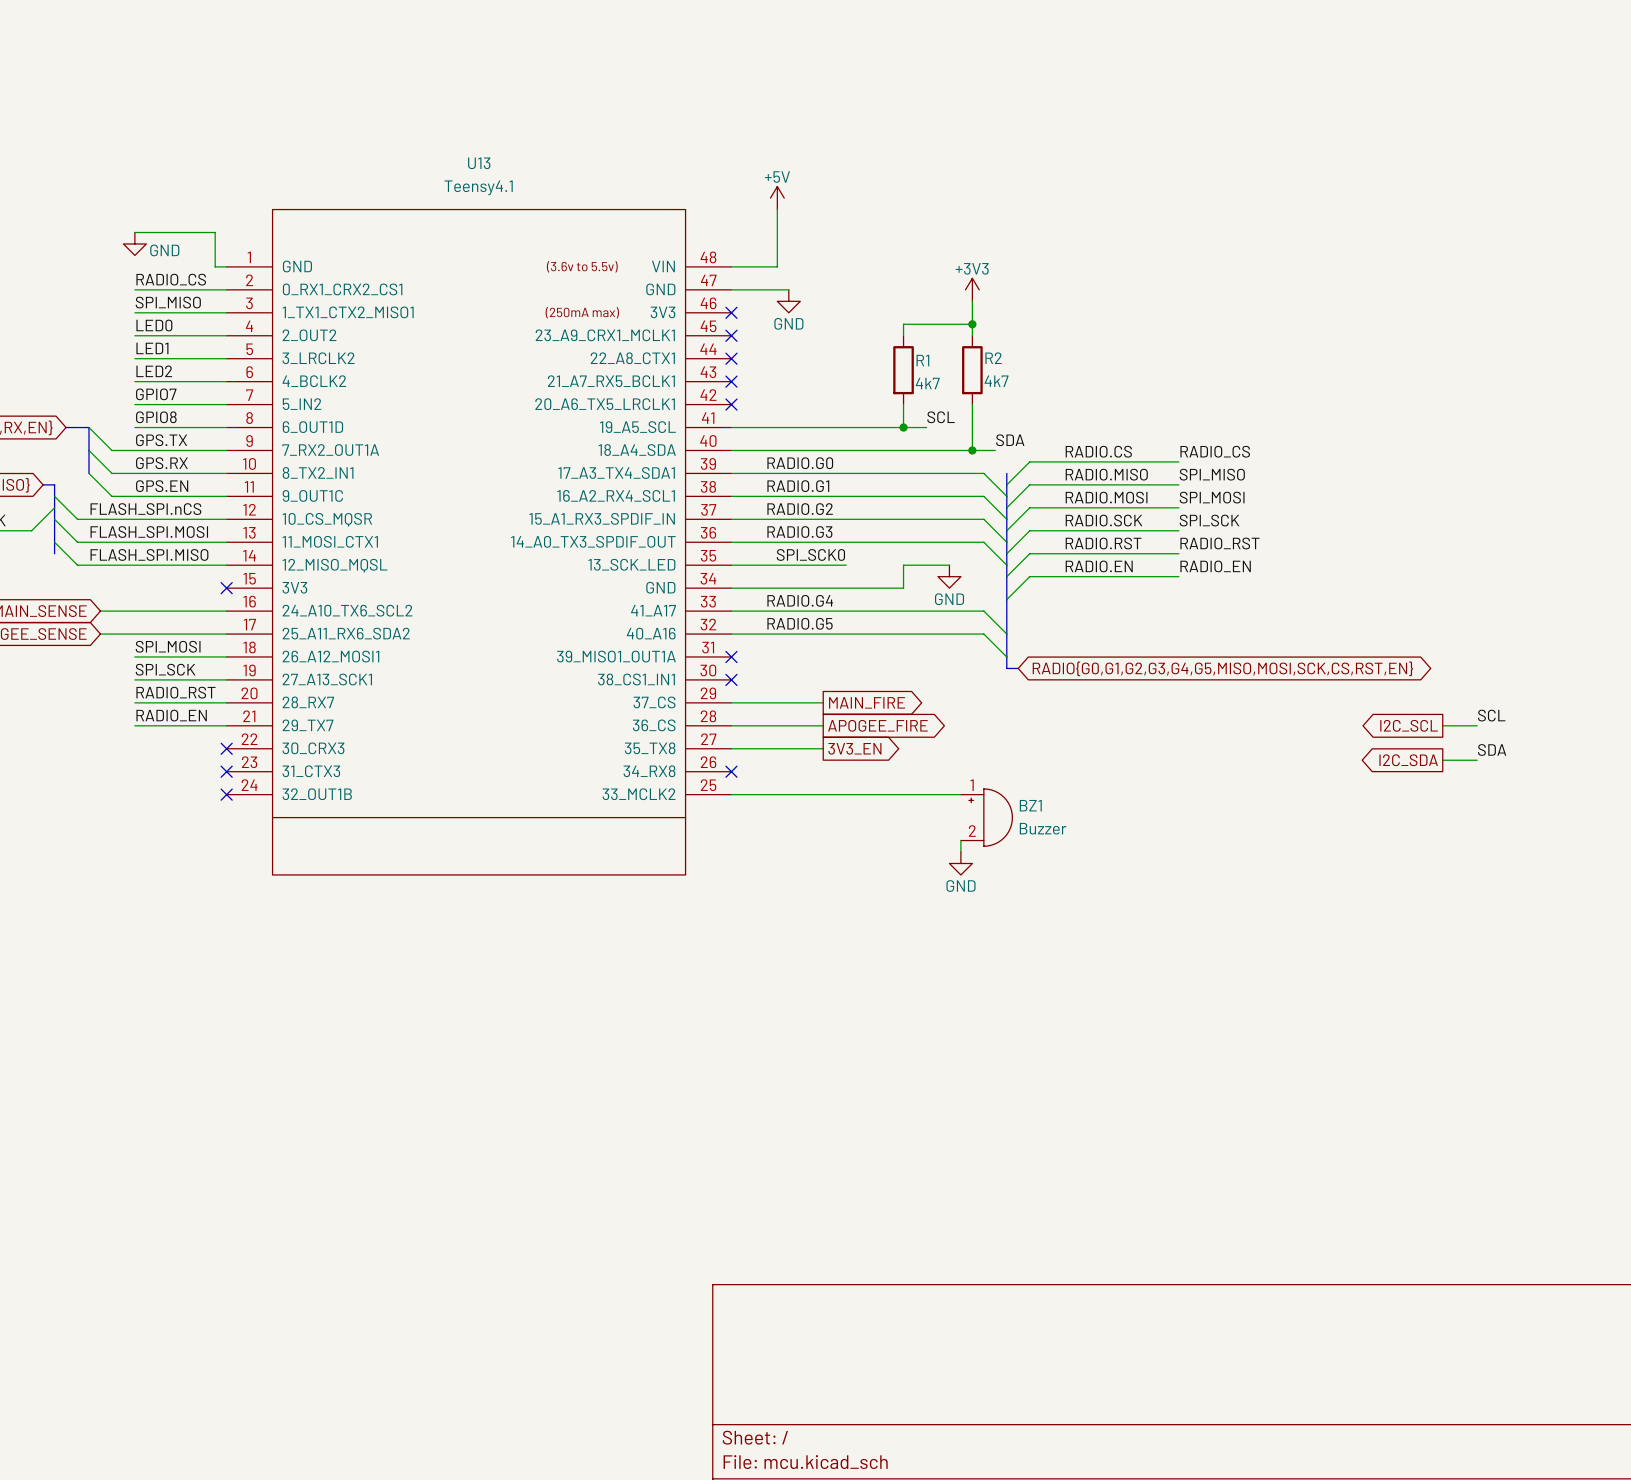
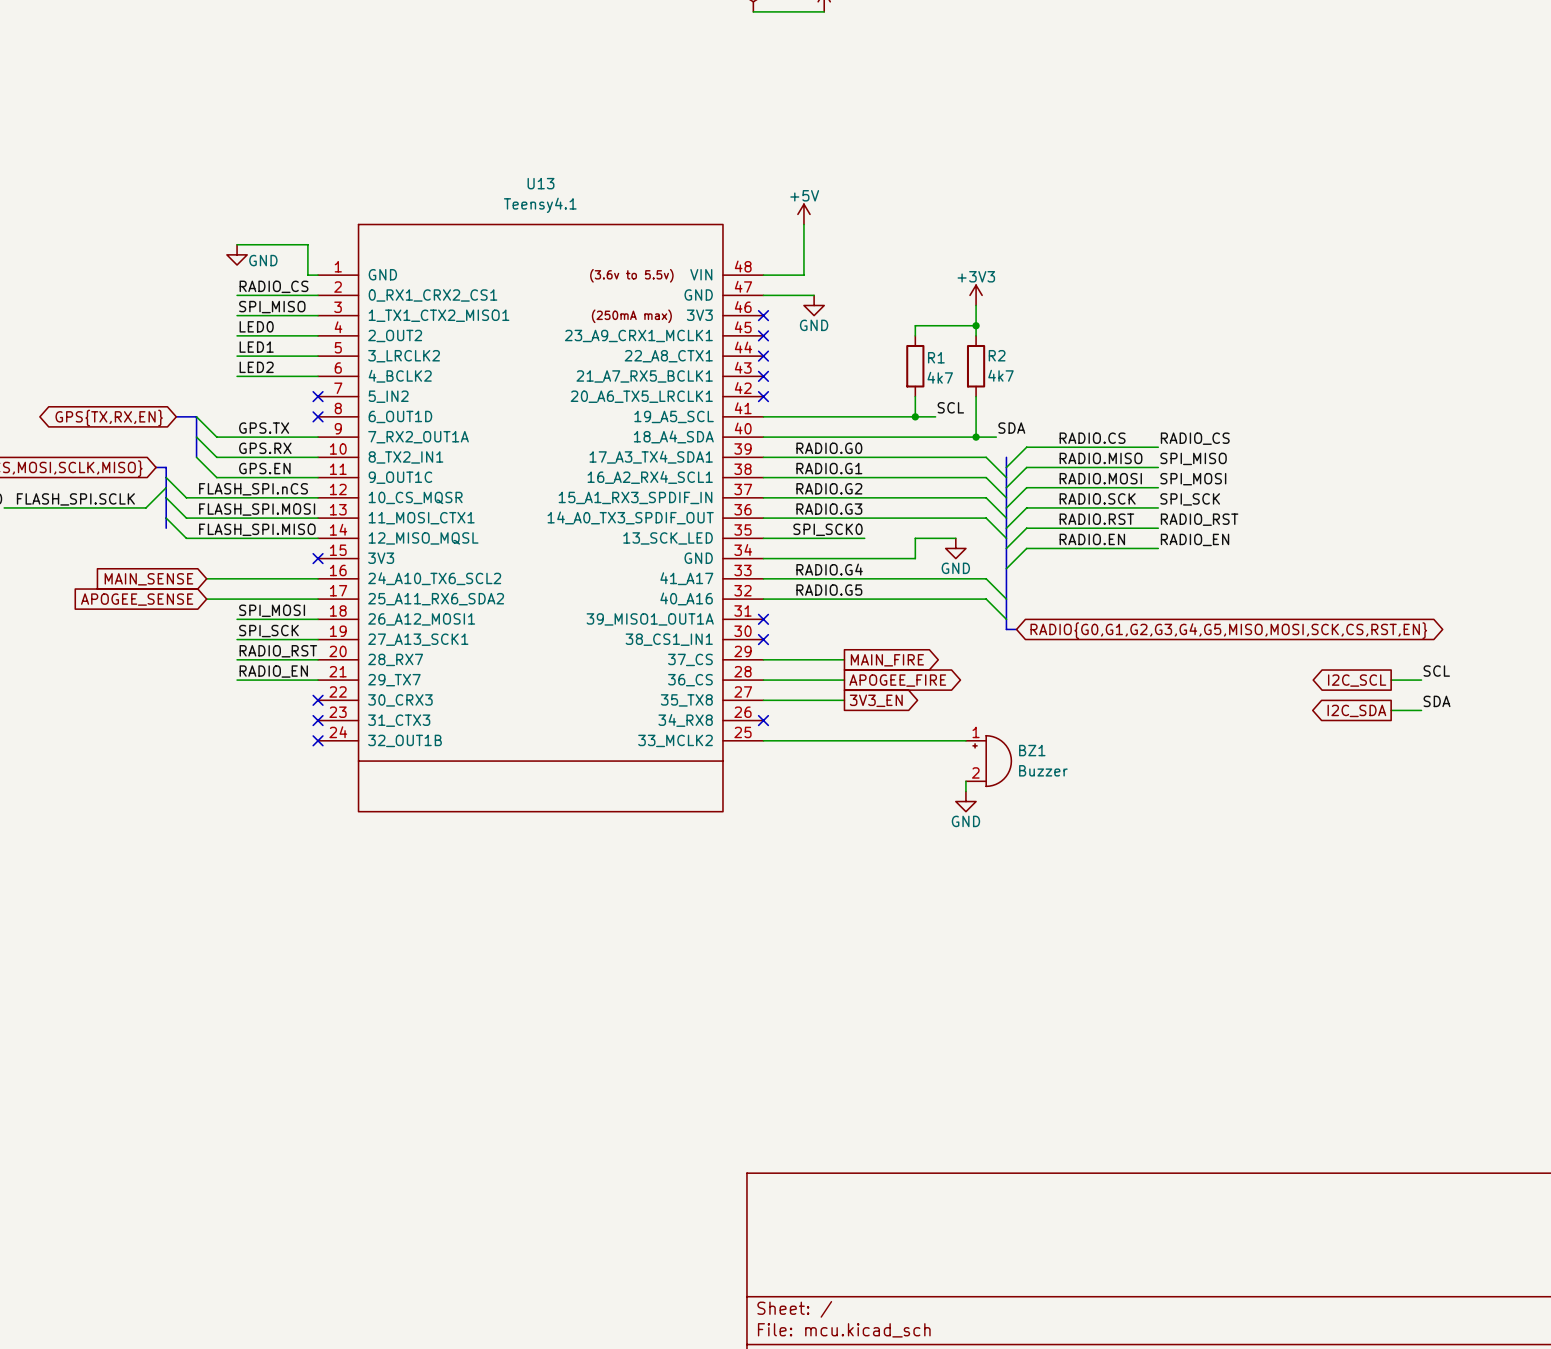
label: GPIO7 (156, 394) -> none
wire: (134, 404) (226, 404) -> none
no-connect mark: none -> (318, 396)
label: GPIO8 (156, 417) -> none
wire: (134, 427) (226, 427) -> none
no-connect mark: none -> (318, 416)

